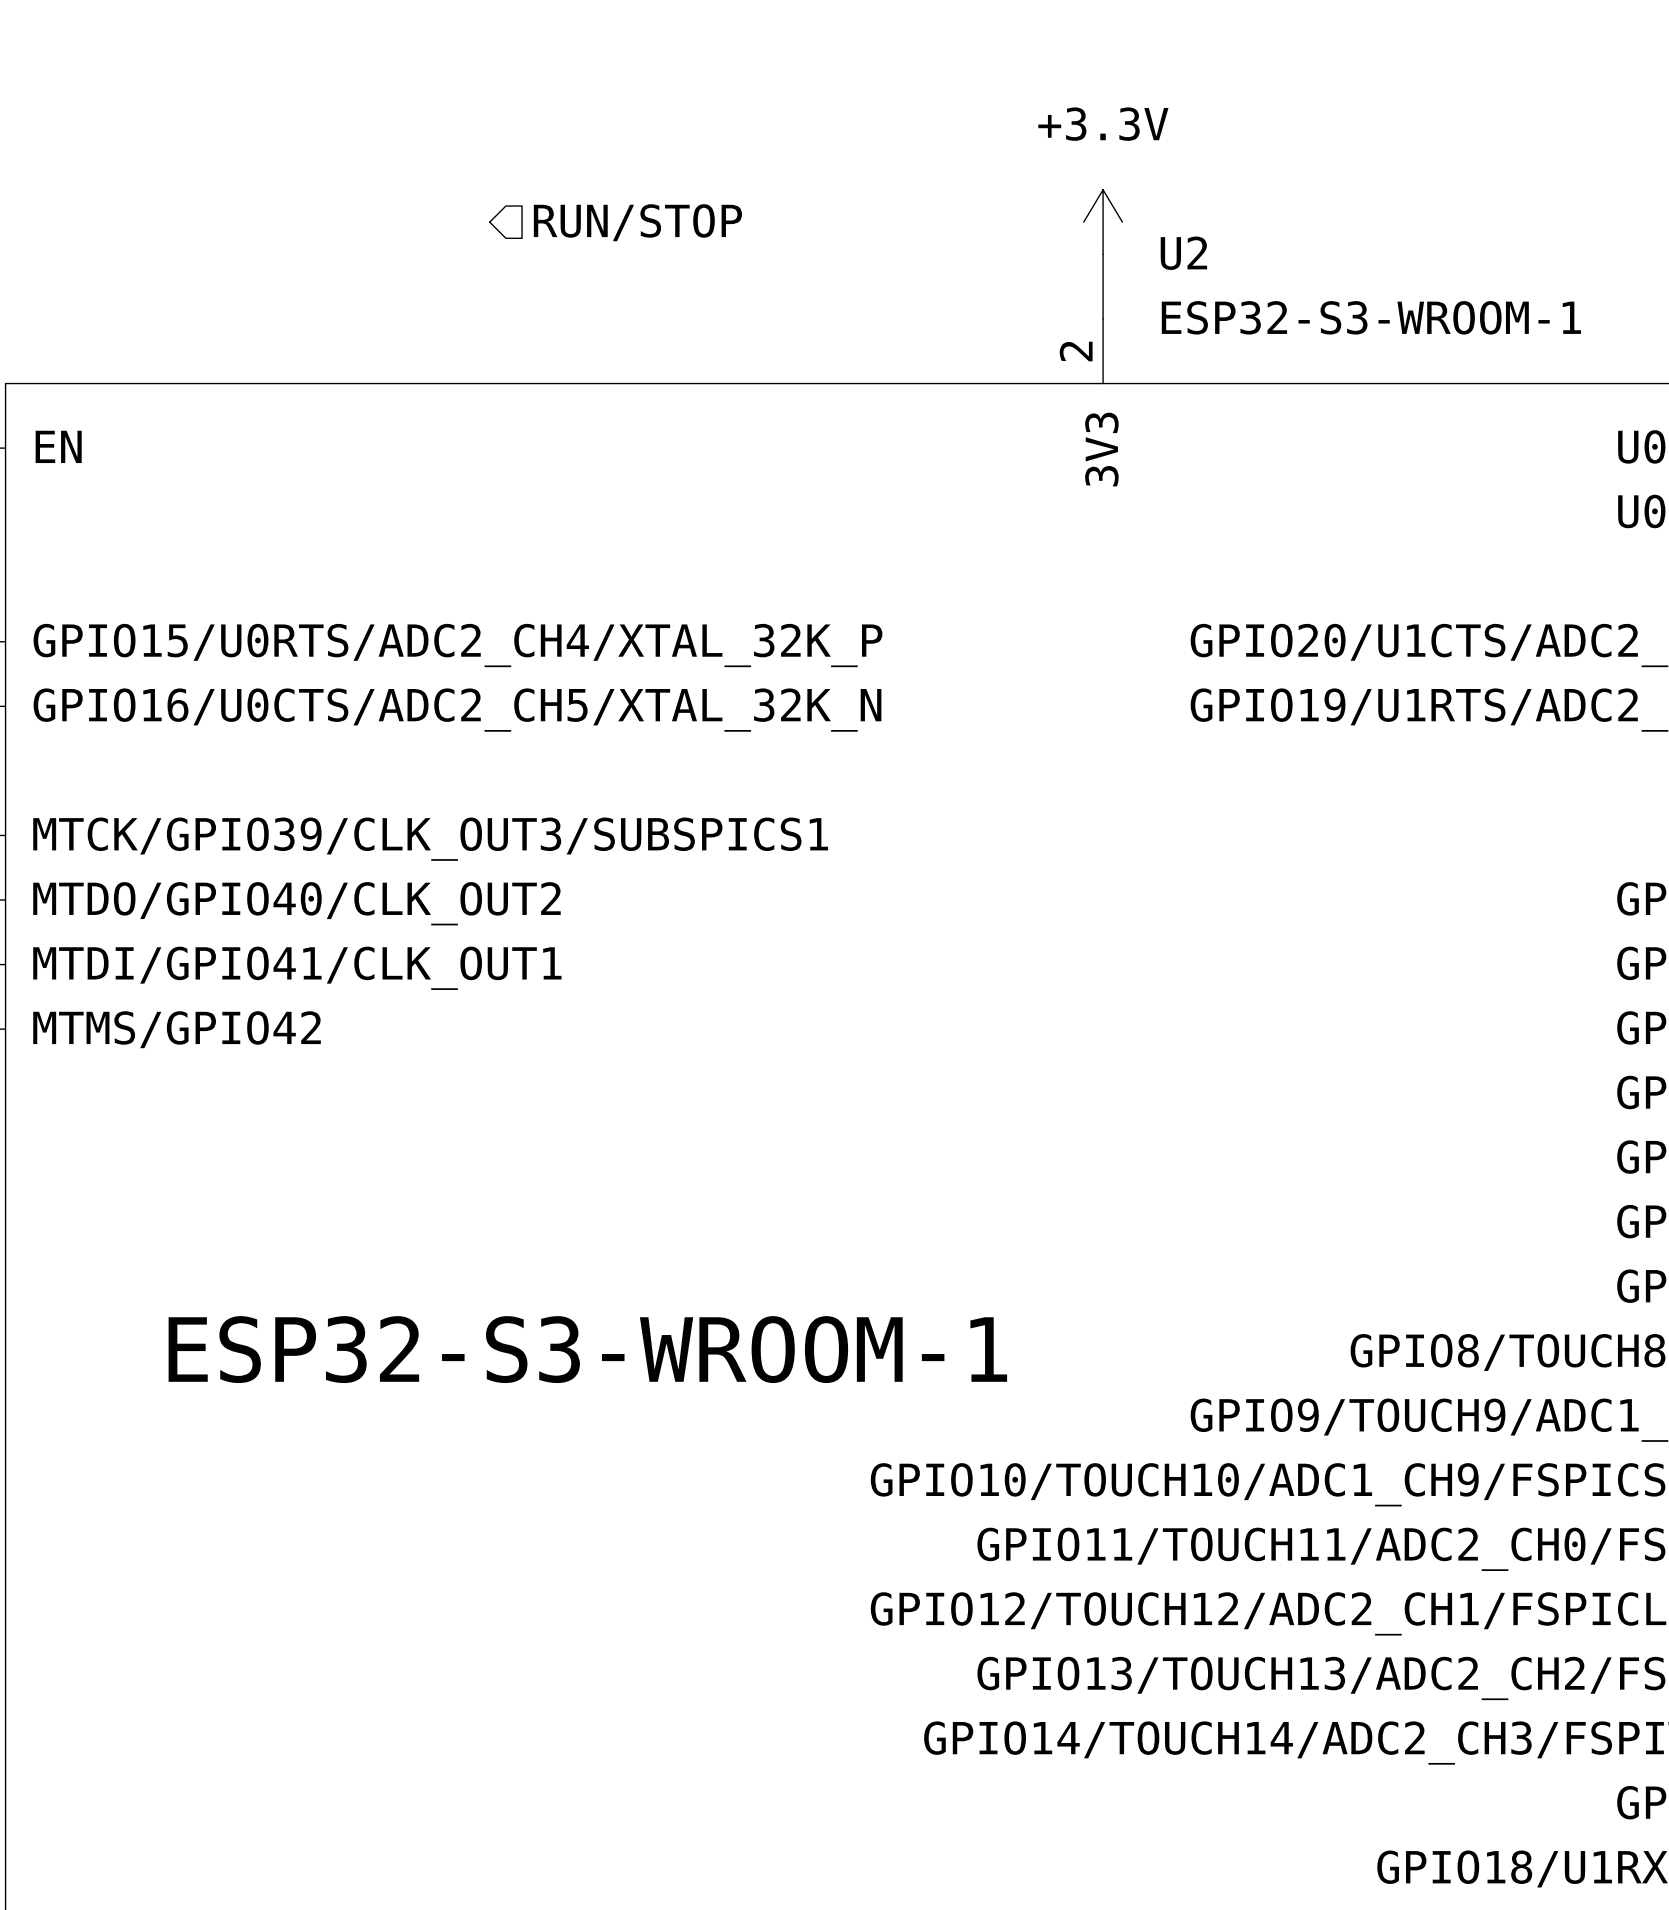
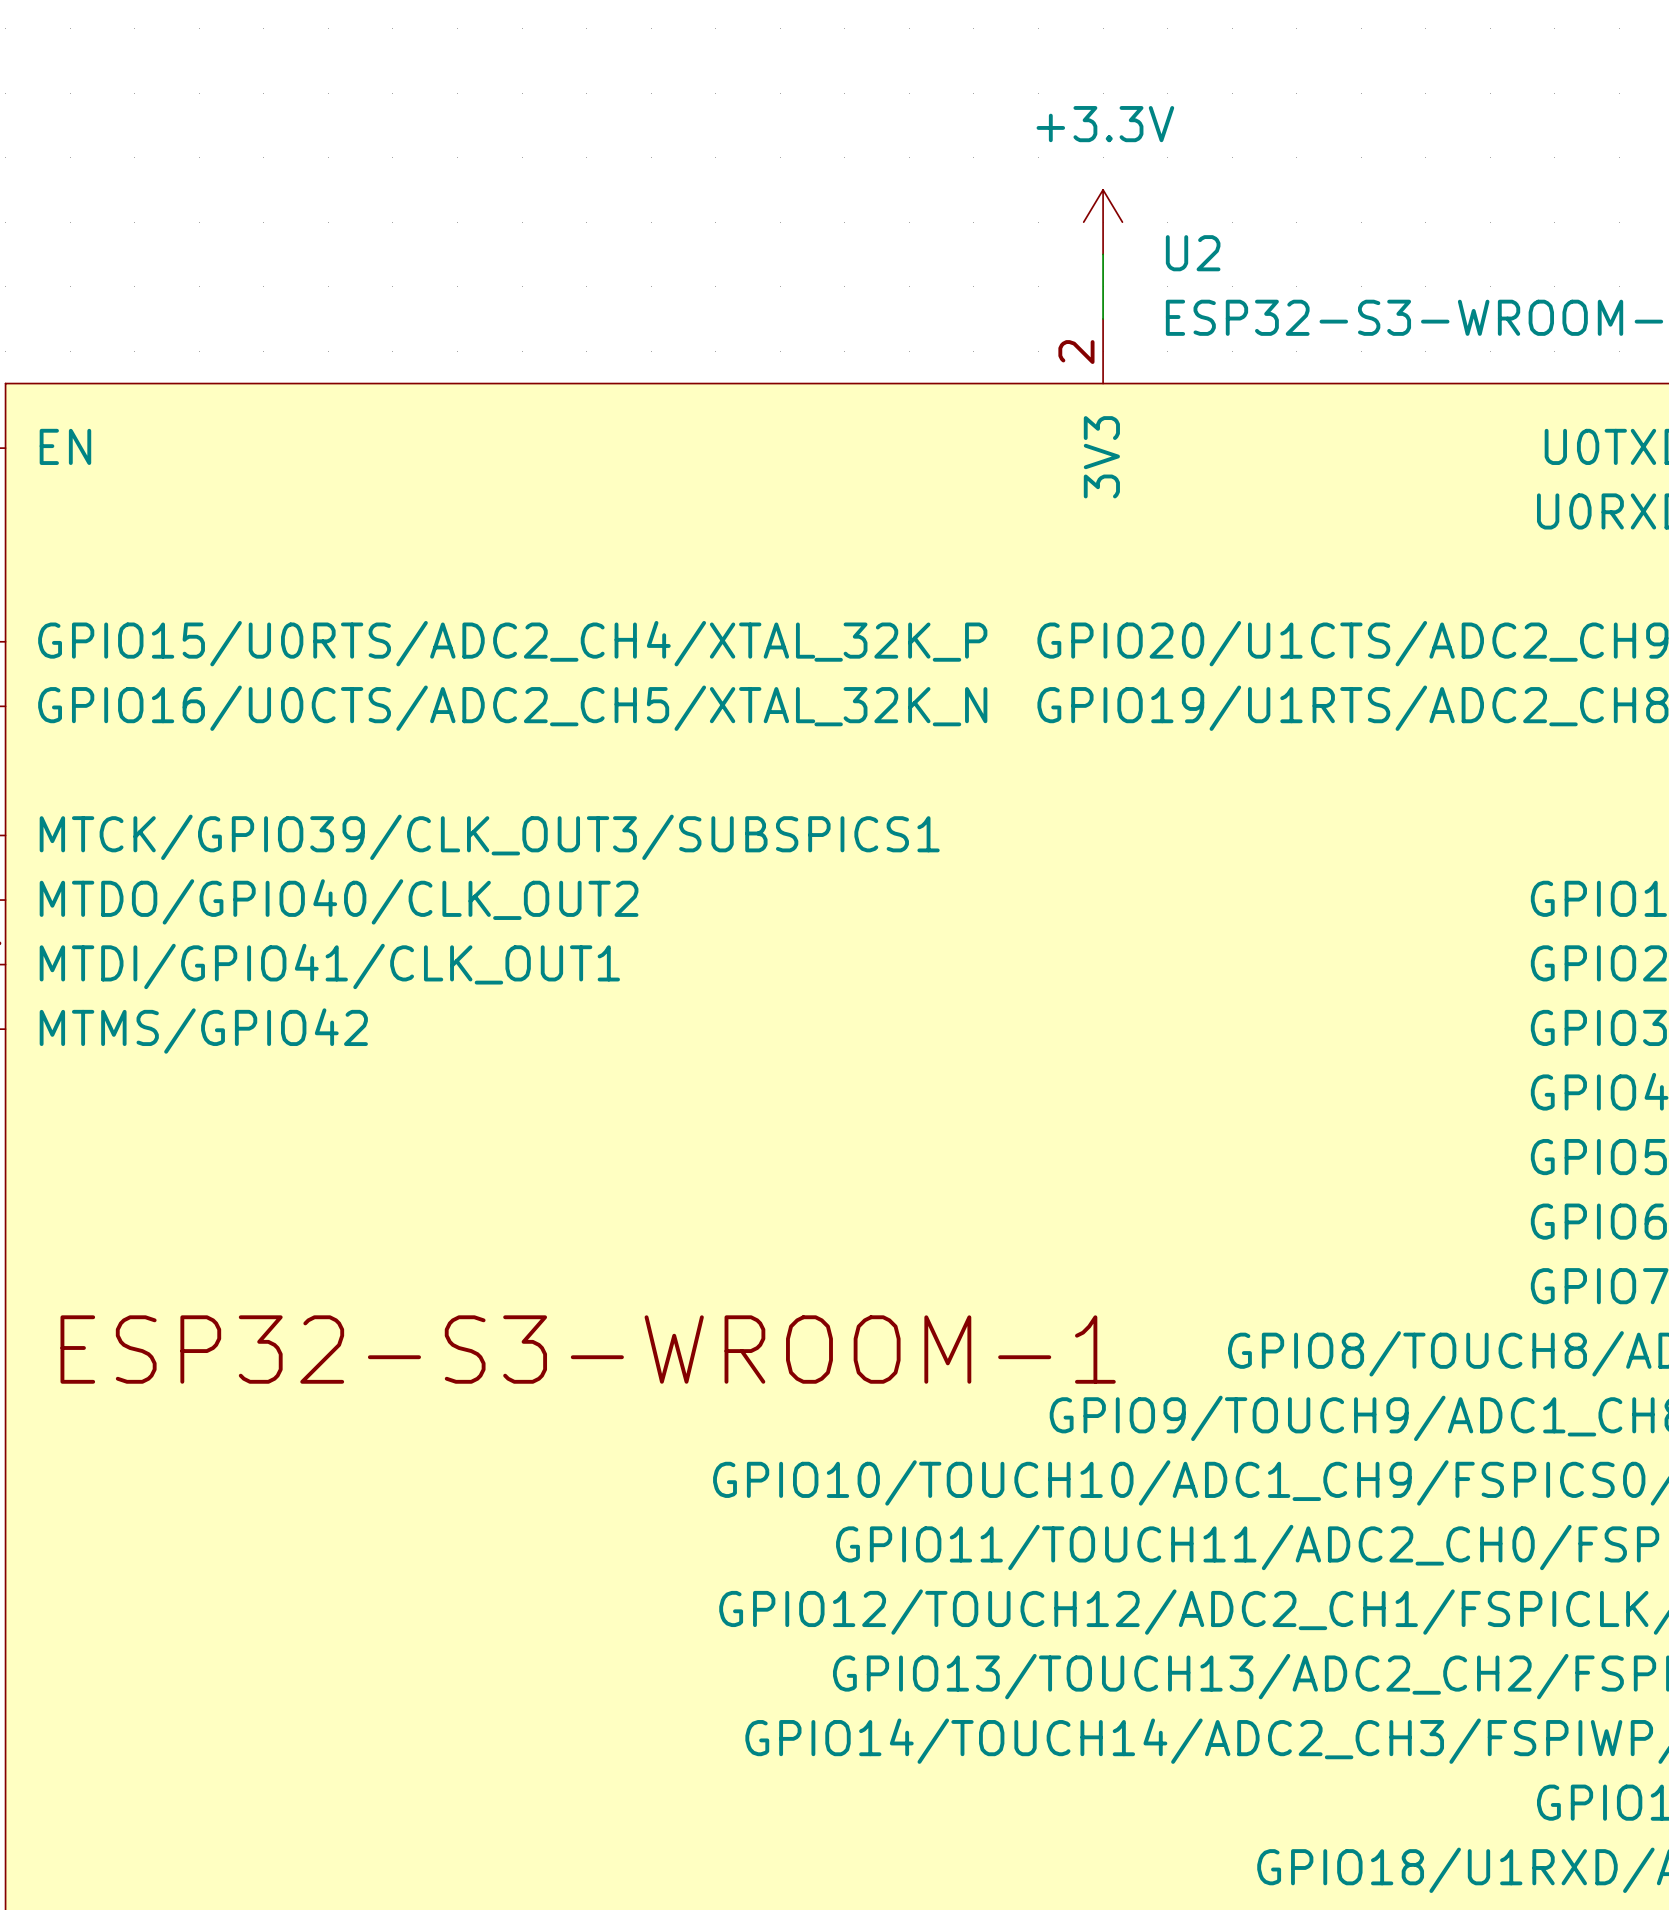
hierarchical label: RUN/STOP (637, 222) -> none

